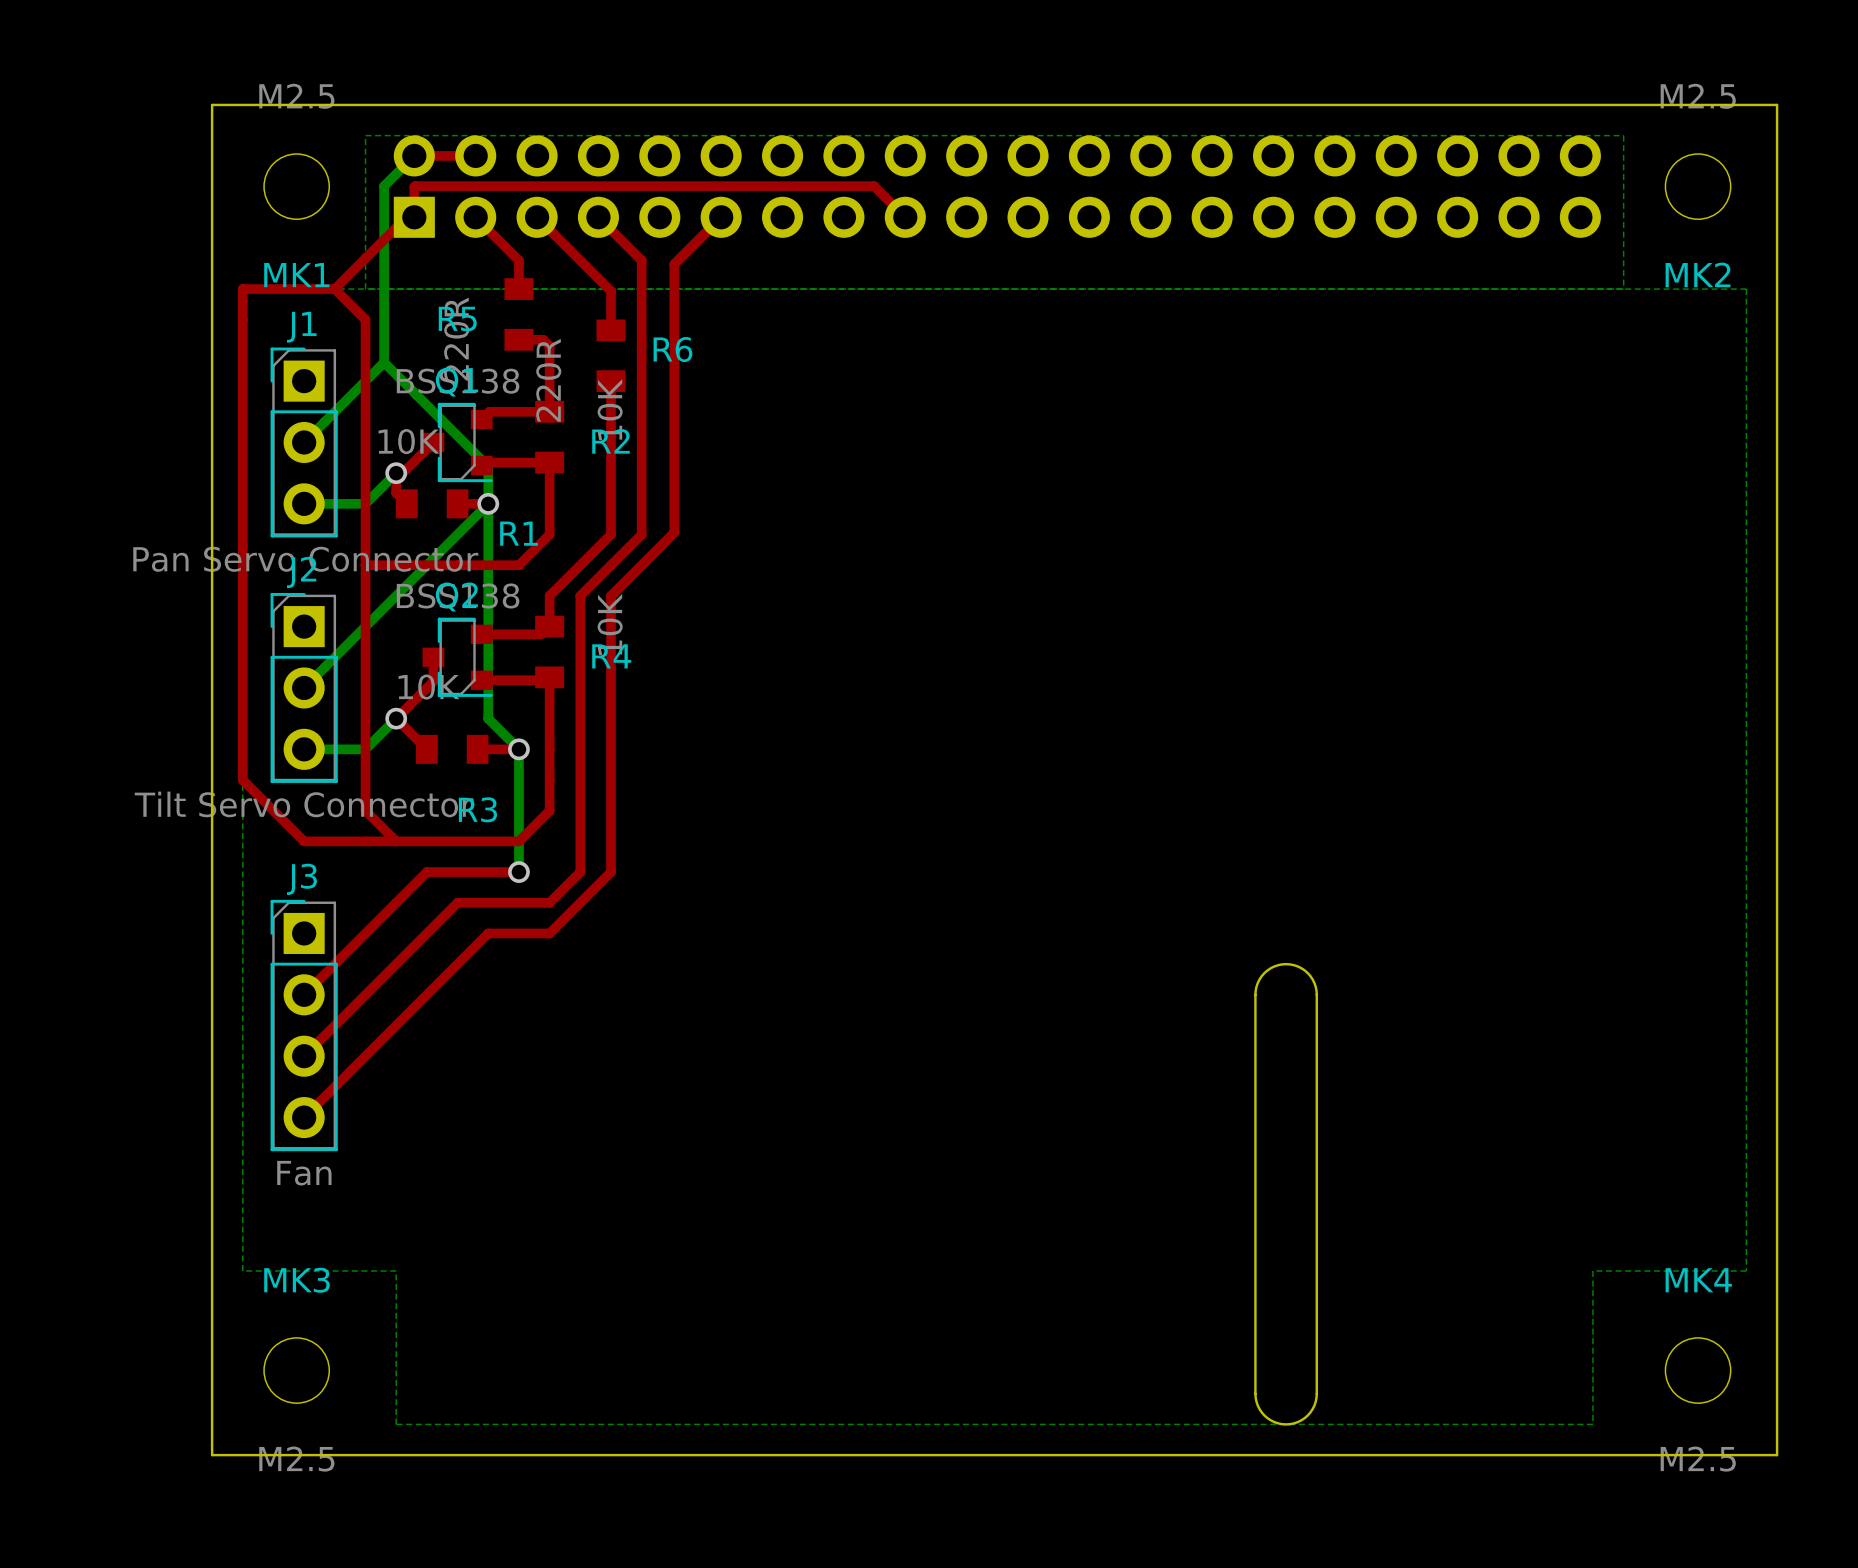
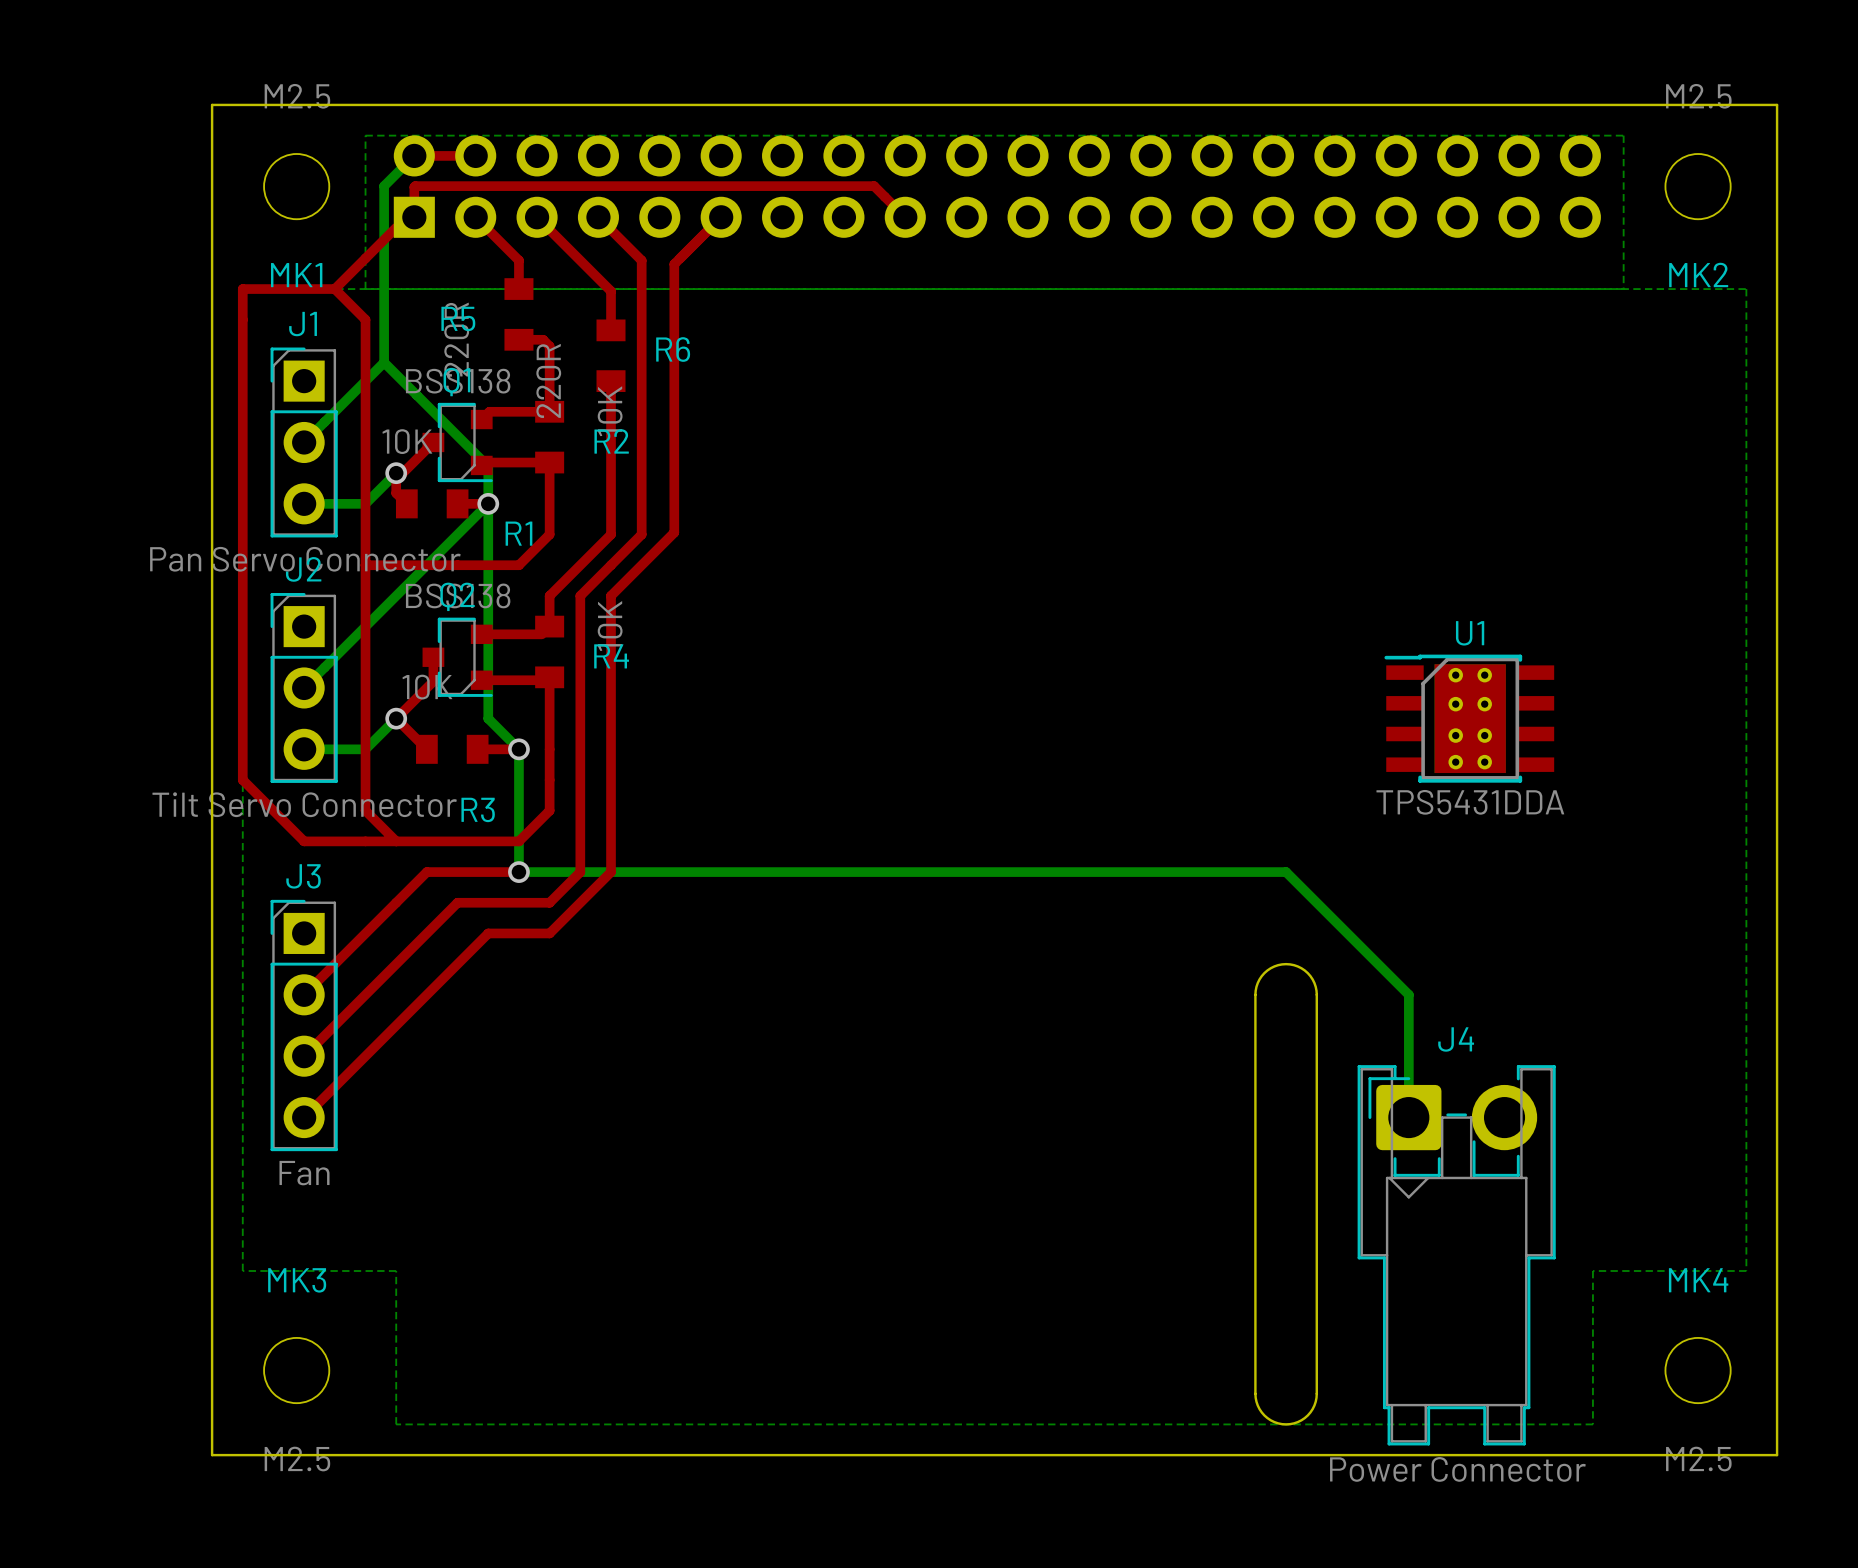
U1: none -> TPS5431DDA (1469, 718)
bottom track: none -> (518, 872) (1286, 872) (1408, 994) (1408, 1117)
J4: none -> Power Connector (1456, 1255)

